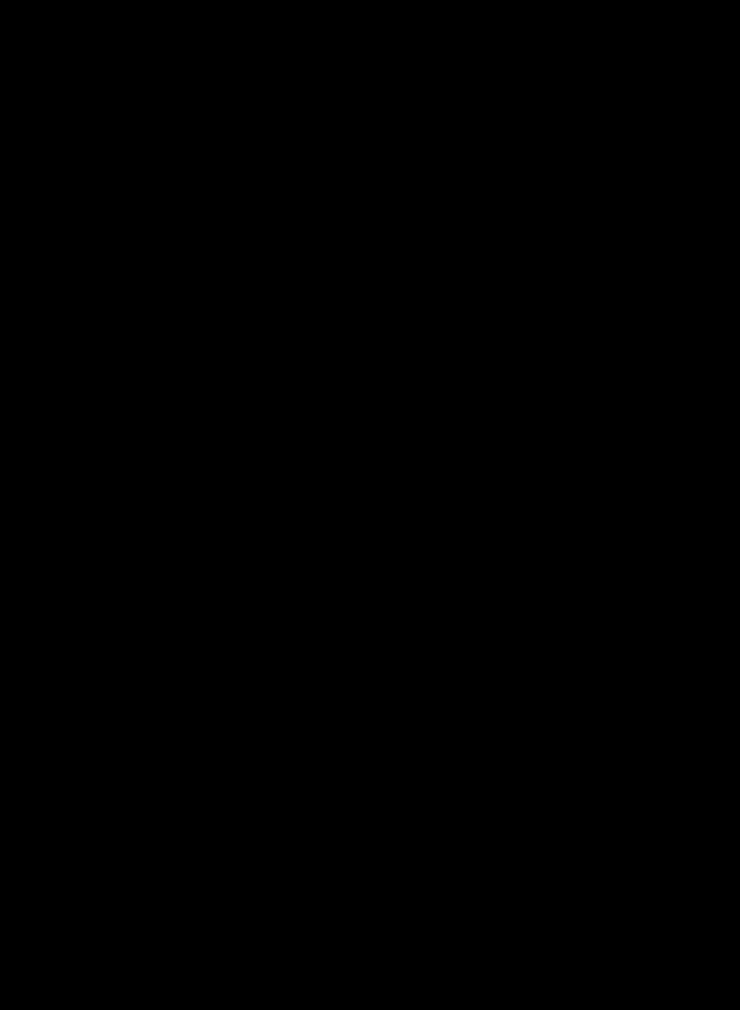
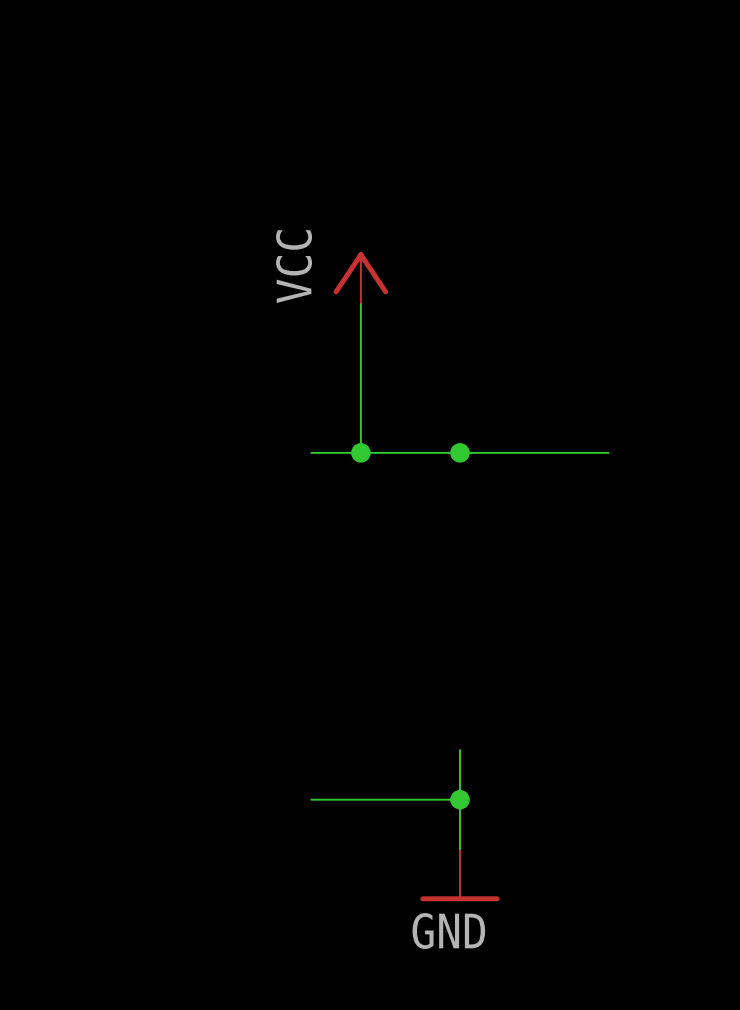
power symbol: none -> VCC (360, 278)
wire: none -> (360, 304) (360, 452)
wire: none -> (311, 452) (608, 452)
junction: none -> (360, 452)
junction: none -> (459, 452)
wire: none -> (459, 750) (459, 849)
wire: none -> (311, 799) (459, 799)
junction: none -> (459, 799)
power symbol: none -> GND (459, 875)

